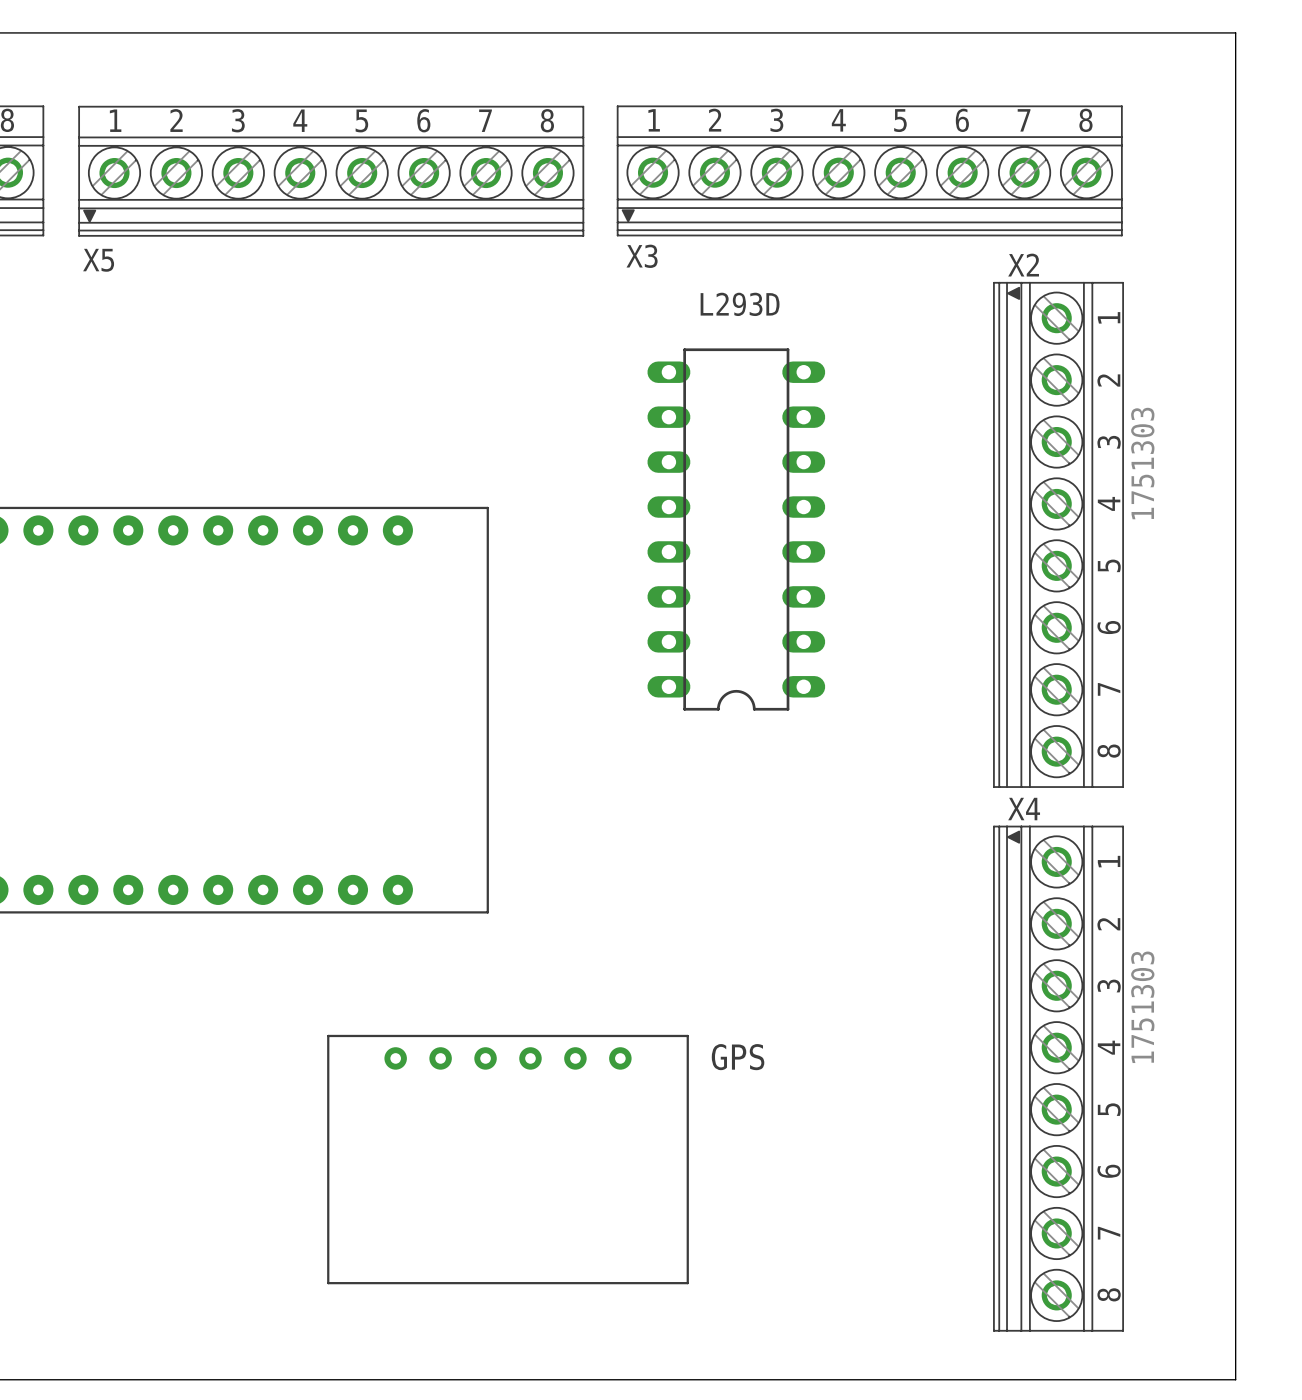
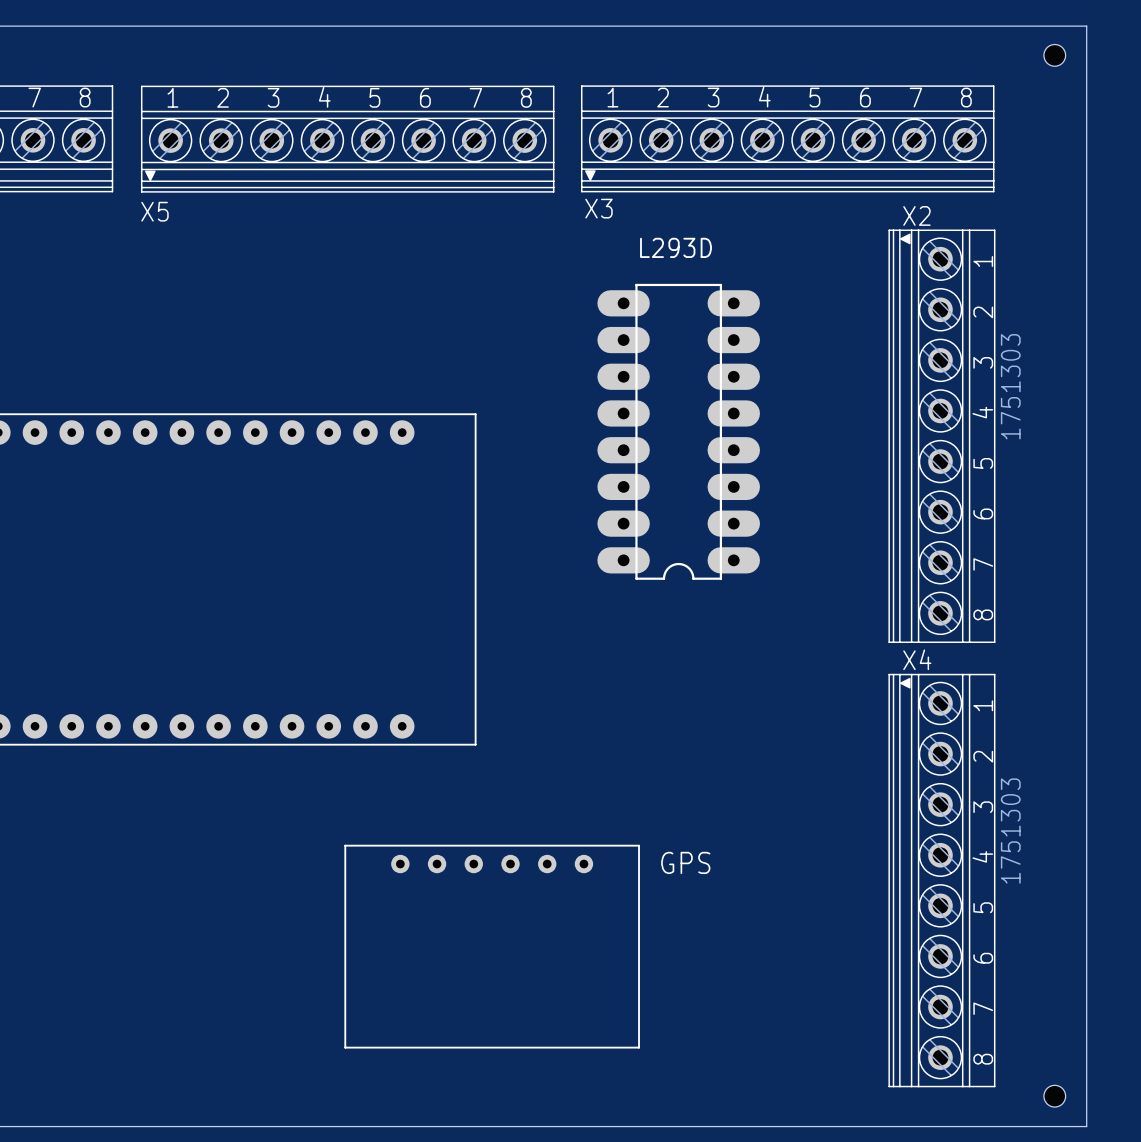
hole: none -> (1054, 55)
part footprint: [647, 348, 826, 711] -> [597, 283, 760, 580]
hole: none -> (1054, 1096)

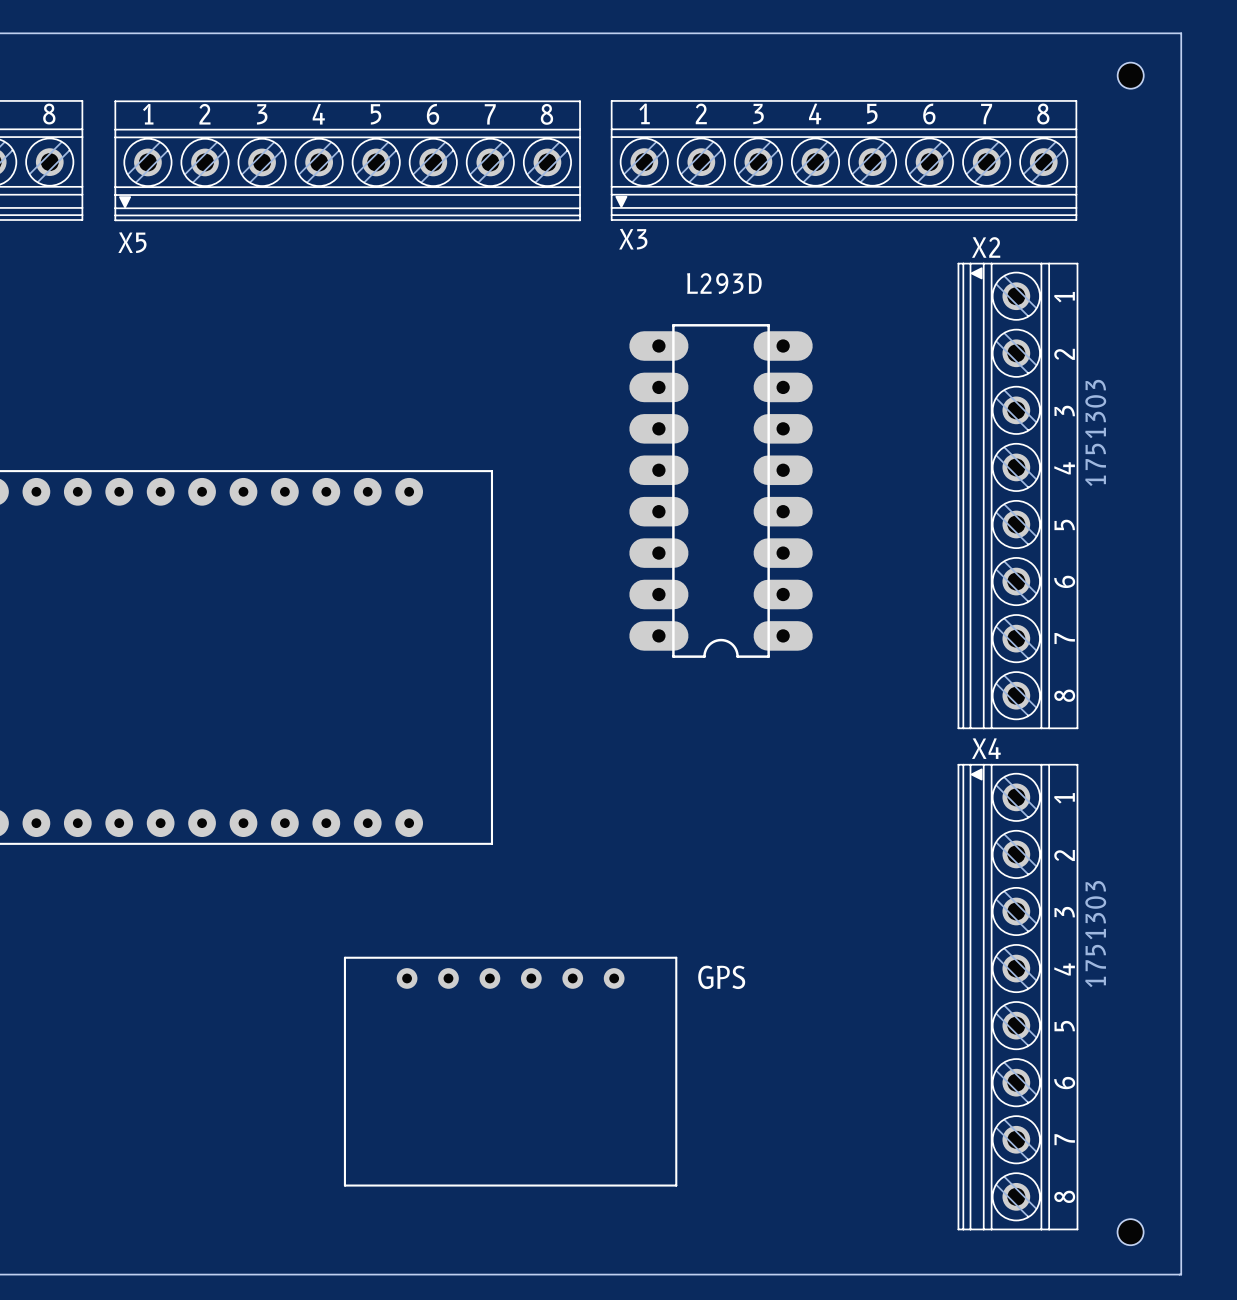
hole: (1054, 55) -> none
hole: none -> (1130, 75)
hole: none -> (1130, 1232)
hole: (1054, 1096) -> none

